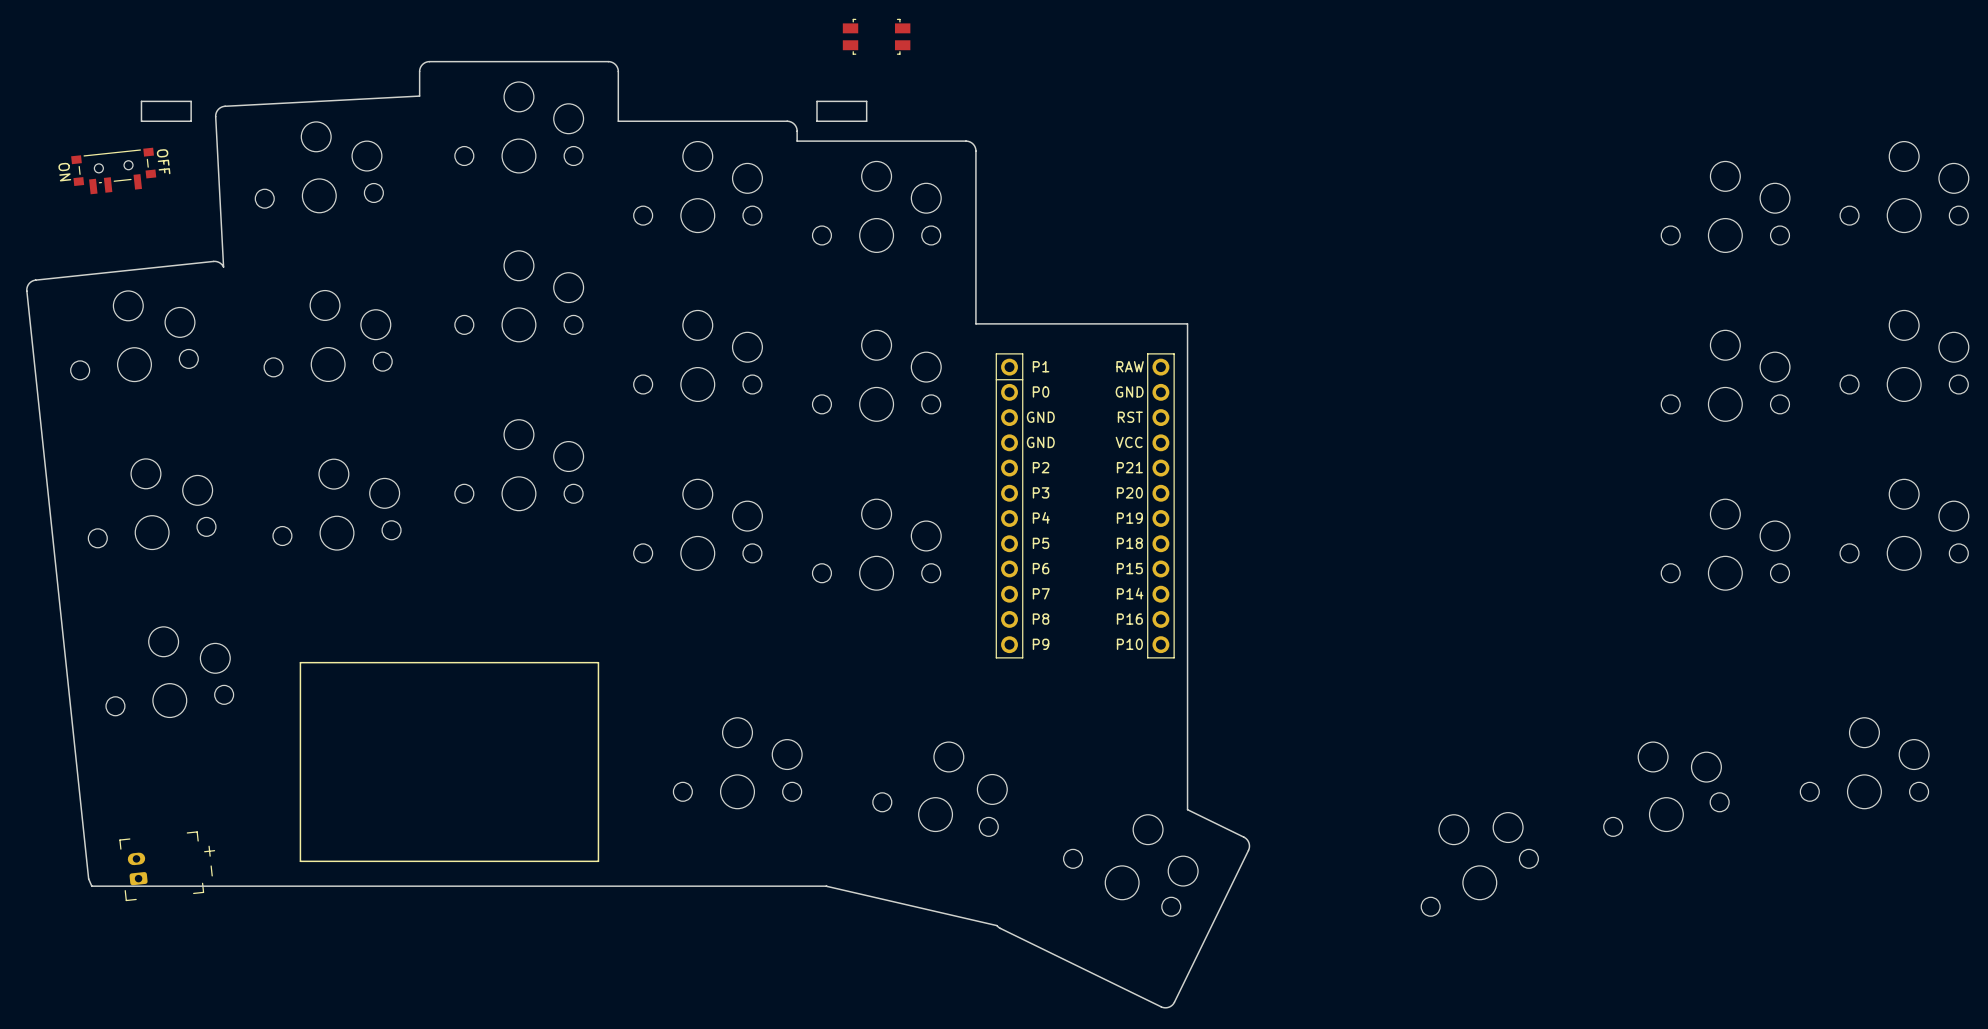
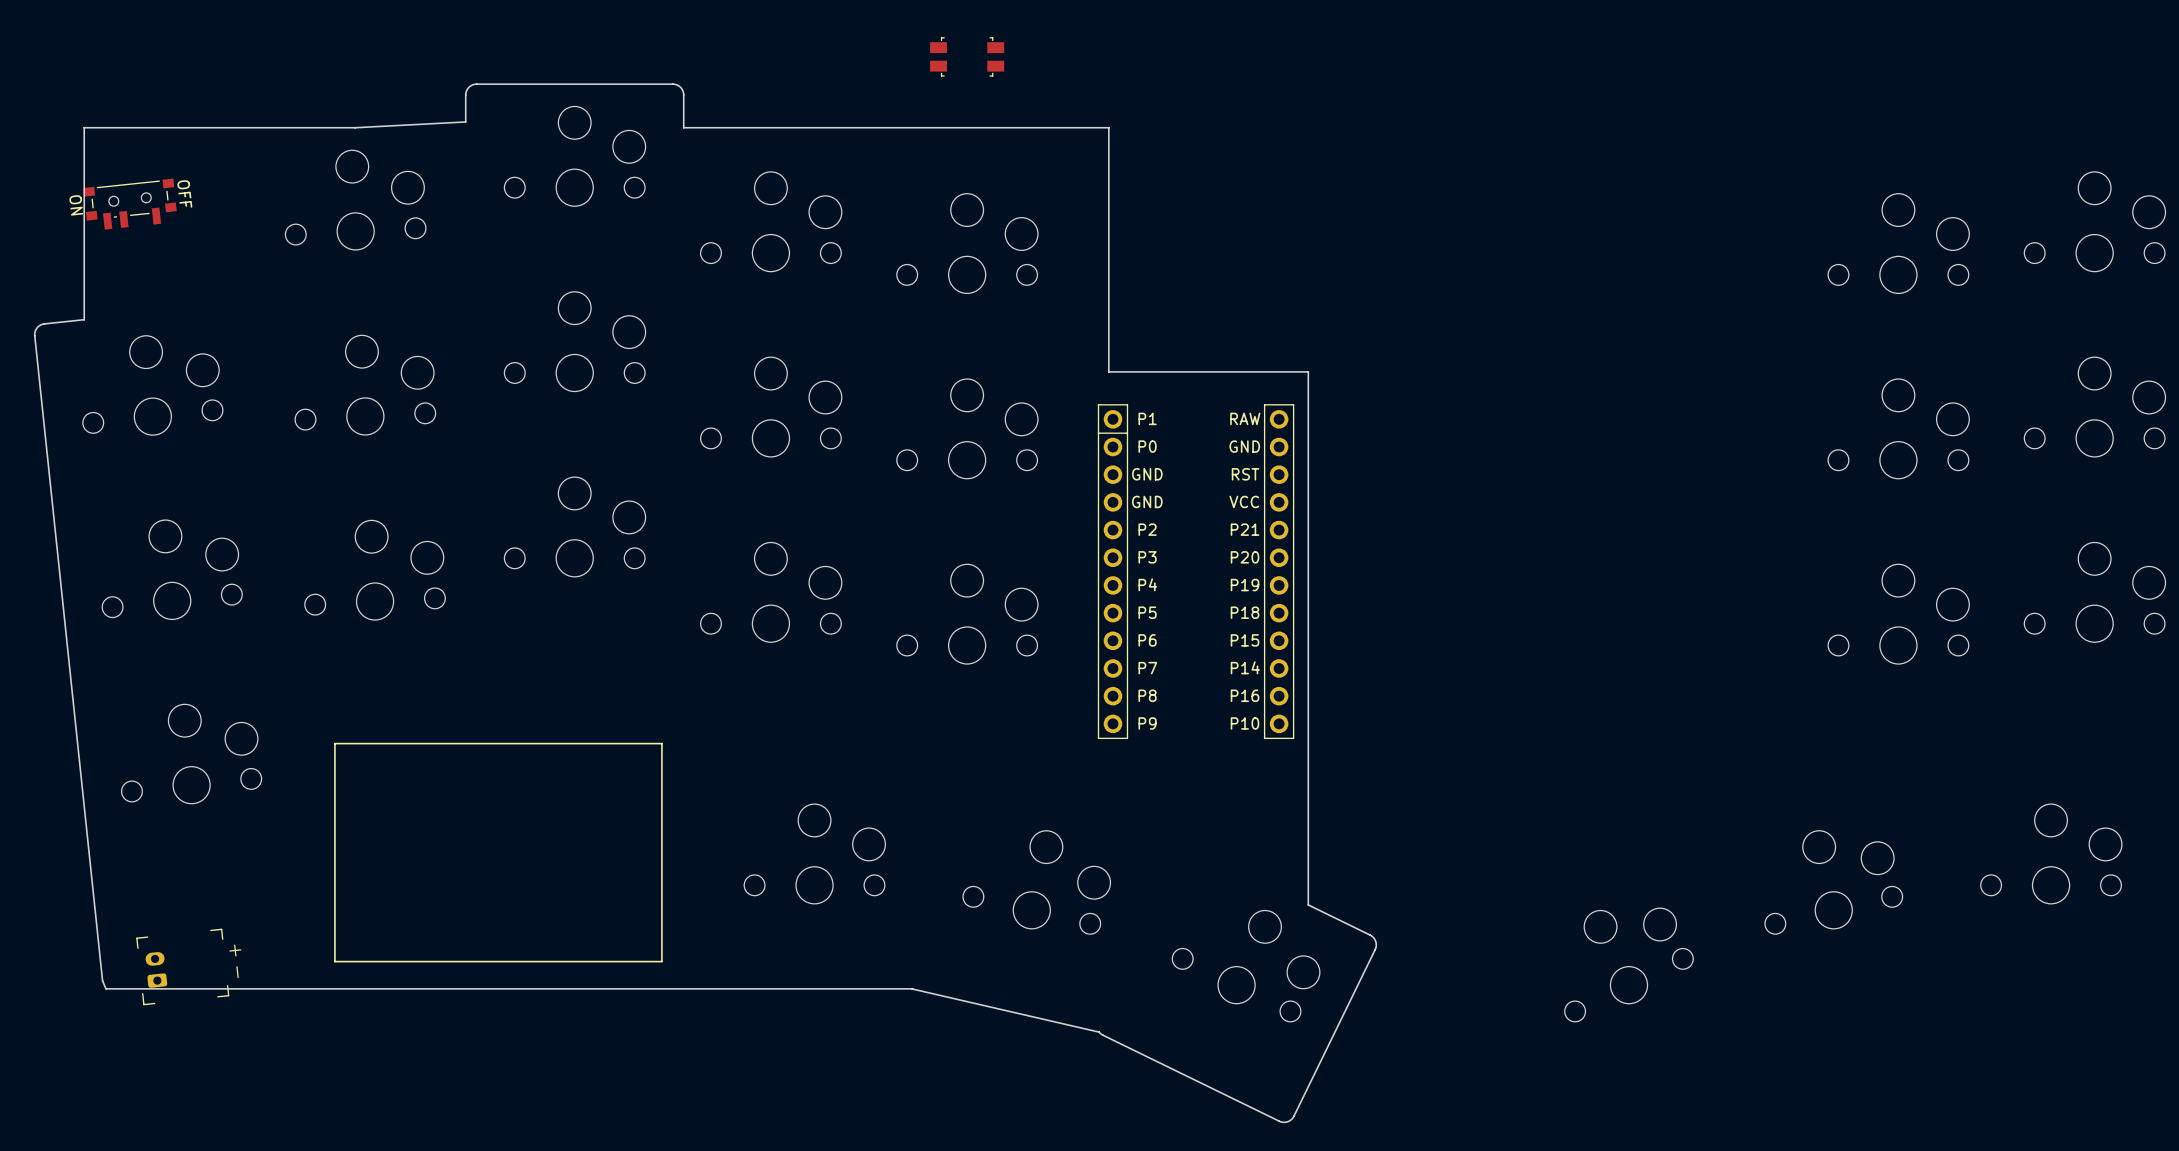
board edge: (141, 101) (141, 121) (191, 121) (191, 101) -> (355, 127) (215, 127)
board edge: (318, 101) (225, 106) (216, 111) (223, 267) (219, 262) (213, 261) (71, 276) -> (160, 127) (84, 127) (84, 319)
board edge: (618, 101) (618, 121) (788, 121) (796, 126) (797, 141) (971, 142) (975, 151) (975, 323) (1005, 323) -> (956, 127) (1108, 127) (1108, 371)
board edge: (816, 101) (816, 121) (866, 121) (866, 101) -> (901, 127) (683, 127)

